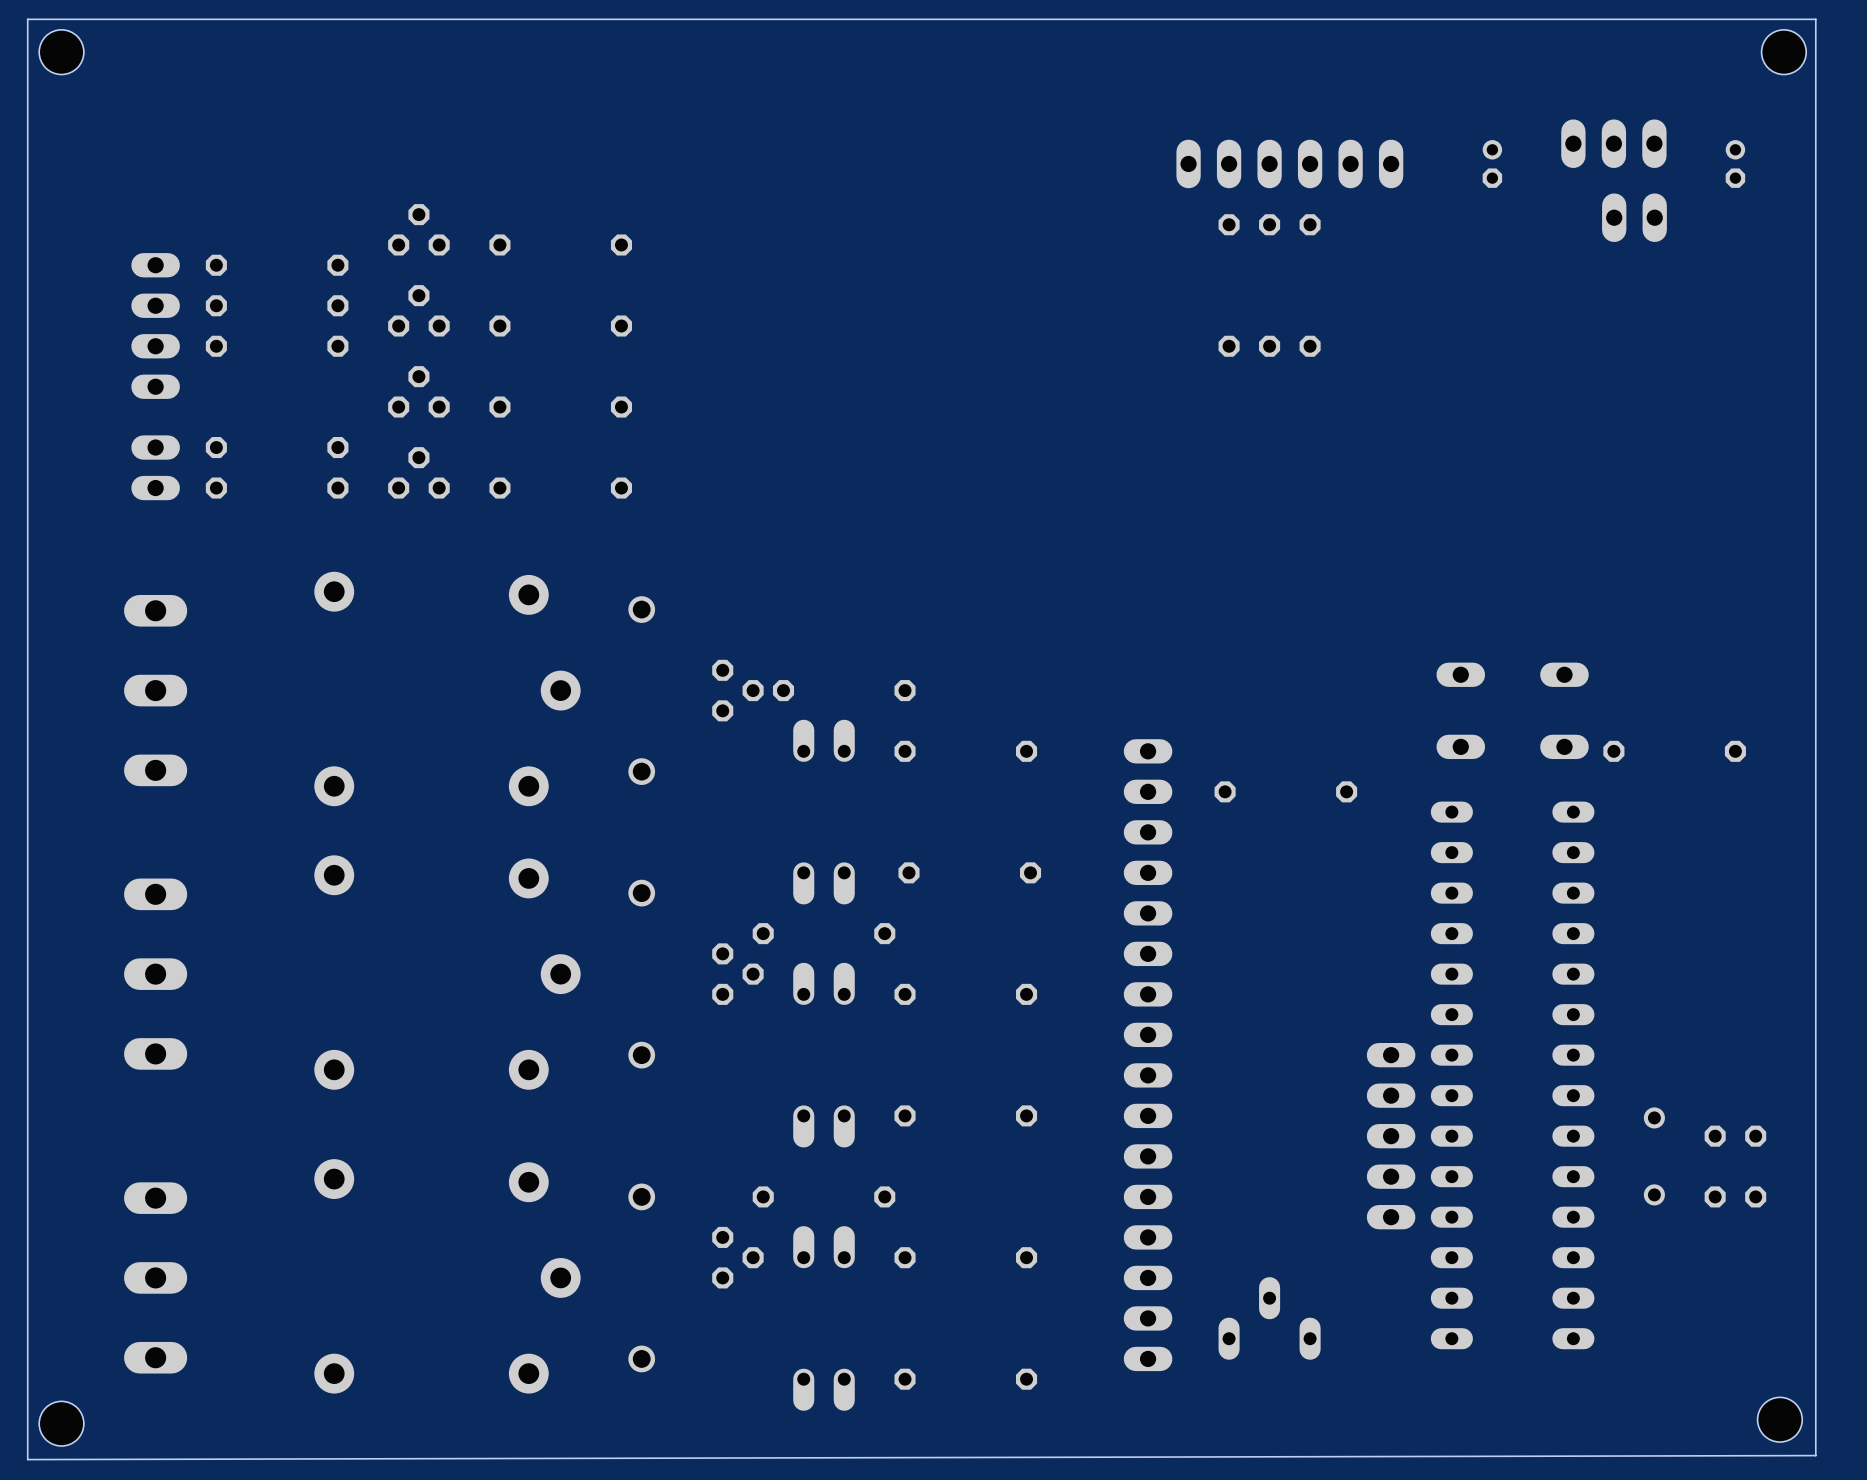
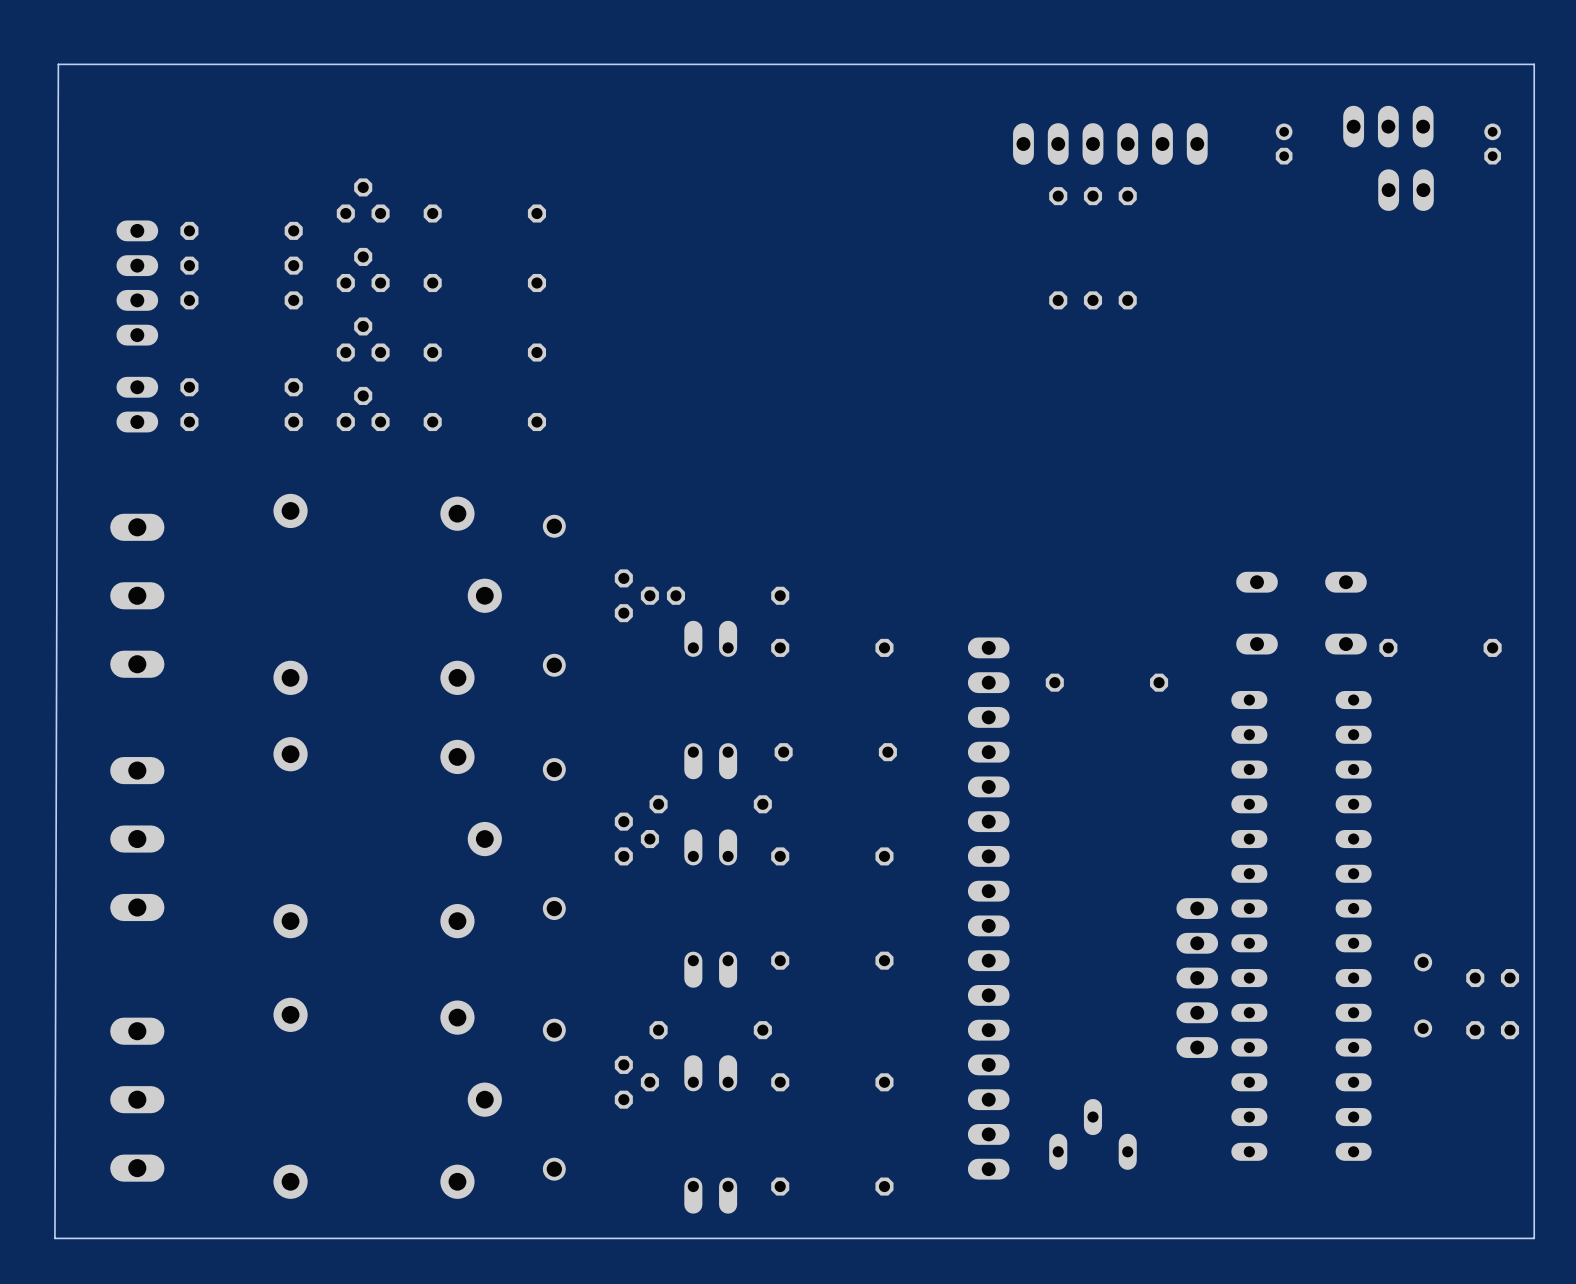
board edge: (1815, 19) (27, 19) (27, 1459) (1815, 1455) (1815, 19) -> (1534, 64) (1534, 1238) (54, 1238) (58, 64) (1534, 64)
hole: (61, 52) -> none
hole: (1783, 52) -> none
hole: (1779, 1419) -> none
hole: (61, 1423) -> none

